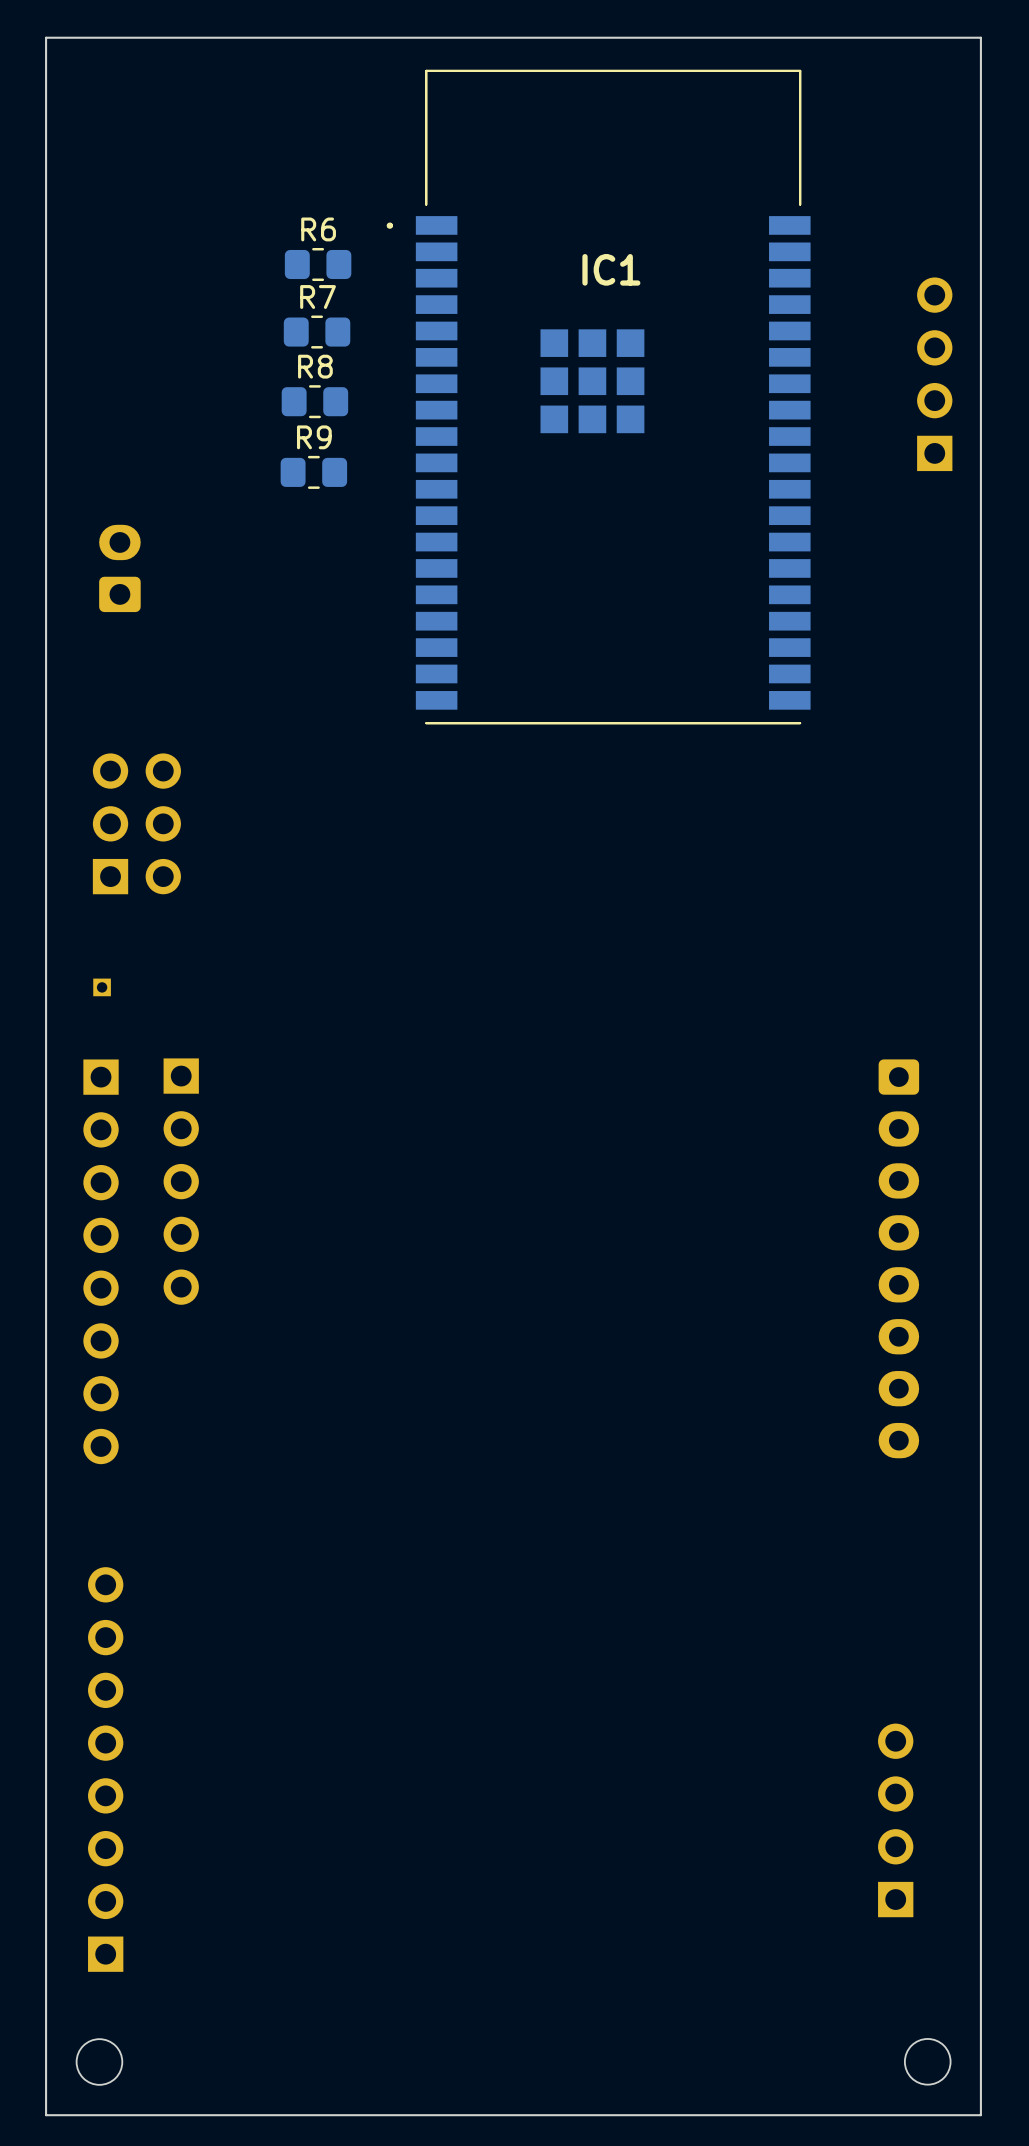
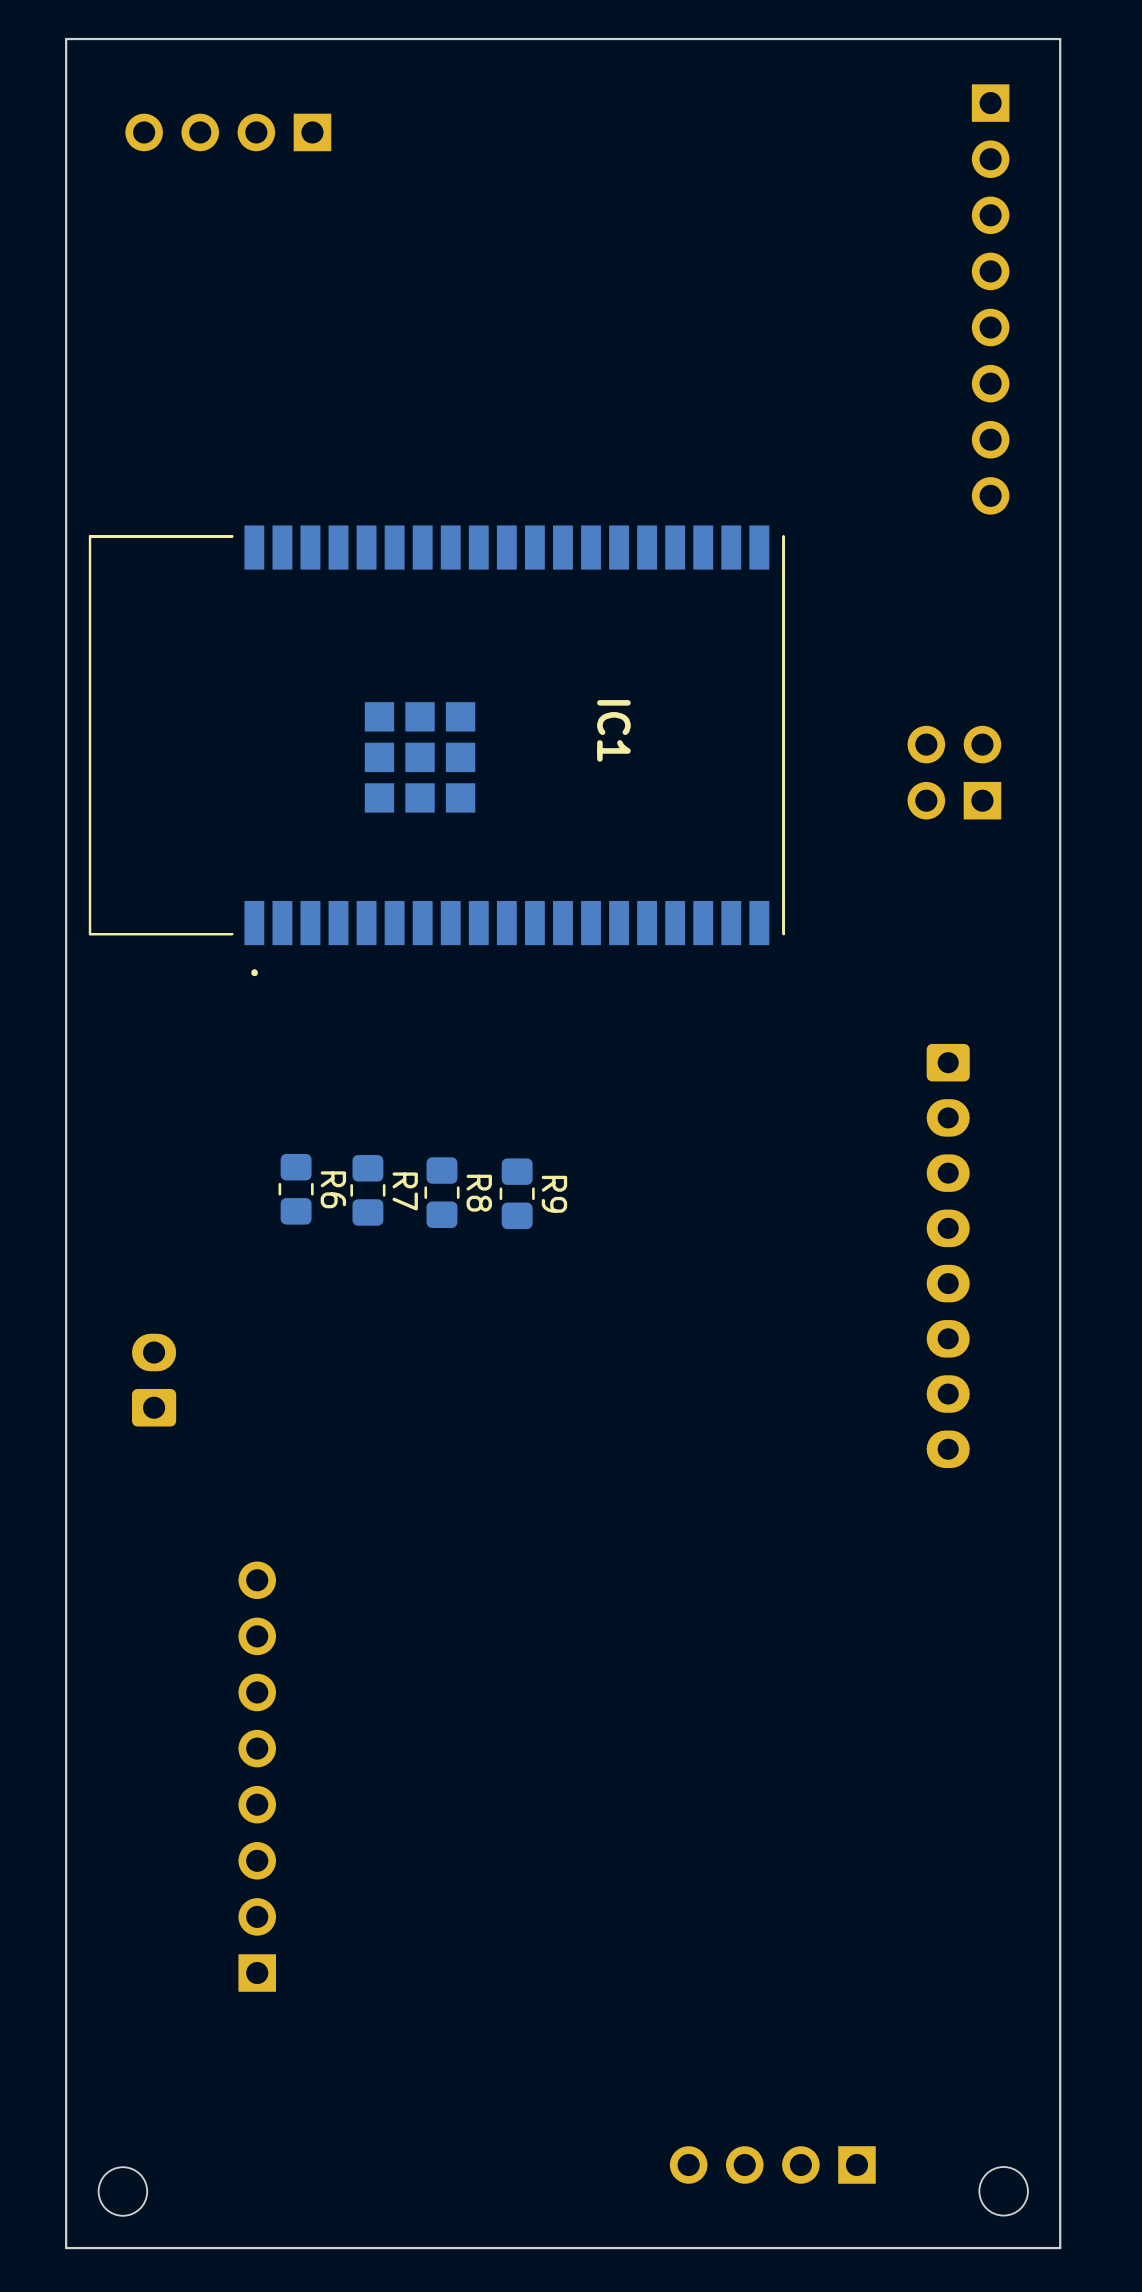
part: none -> (228, 132)
R6 rotation: 0° (318, 264) -> 90° clockwise (296, 1189)
R6 position: (318, 264) -> (296, 1189)
IC1 name position: IC1 (611, 269) -> IC1 (613, 730)
part: none -> (990, 299)
R7 rotation: 0° (317, 332) -> 90° clockwise (367, 1190)
R7 position: (317, 332) -> (367, 1190)
part: (934, 374) -> none
IC1 rotation: 0° (598, 397) -> 90° counterclockwise (436, 750)
R8 rotation: 0° (314, 401) -> 90° clockwise (441, 1192)
R8 position: (314, 401) -> (441, 1192)
R9 rotation: 0° (313, 472) -> 90° clockwise (517, 1193)
R9 position: (313, 472) -> (517, 1193)
part: (119, 568) -> none
part: none -> (954, 772)
part: (136, 823) -> none
part: (102, 987) -> none
part: (181, 1181) -> none
part position: (898, 1258) -> (948, 1255)
part: (101, 1261) -> none
part: none -> (154, 1380)
part position: (105, 1769) -> (257, 1776)
part rotation: 0° (895, 1820) -> 90° counterclockwise (772, 2164)
part position: (895, 1820) -> (772, 2164)

